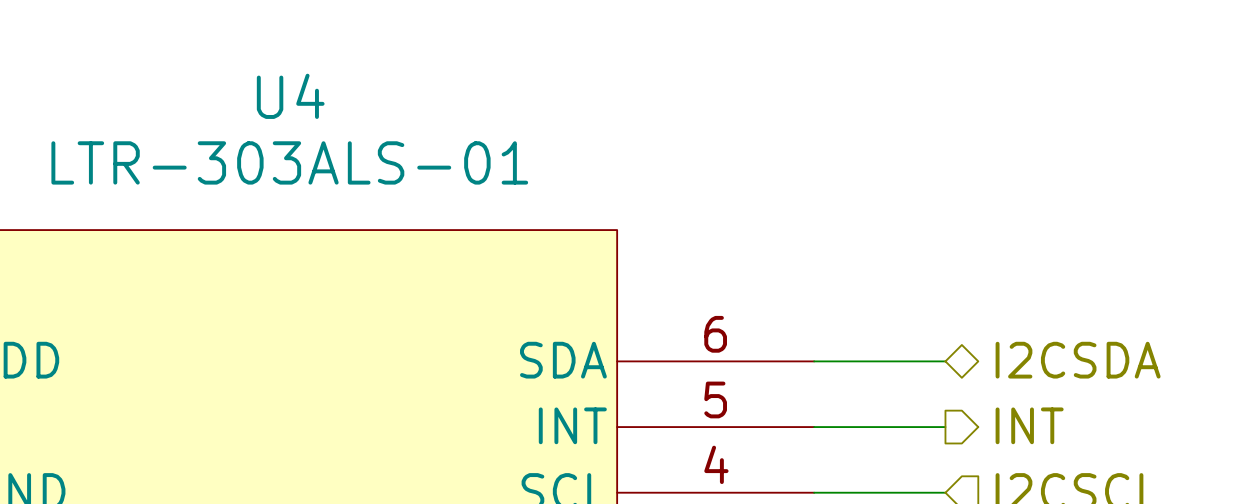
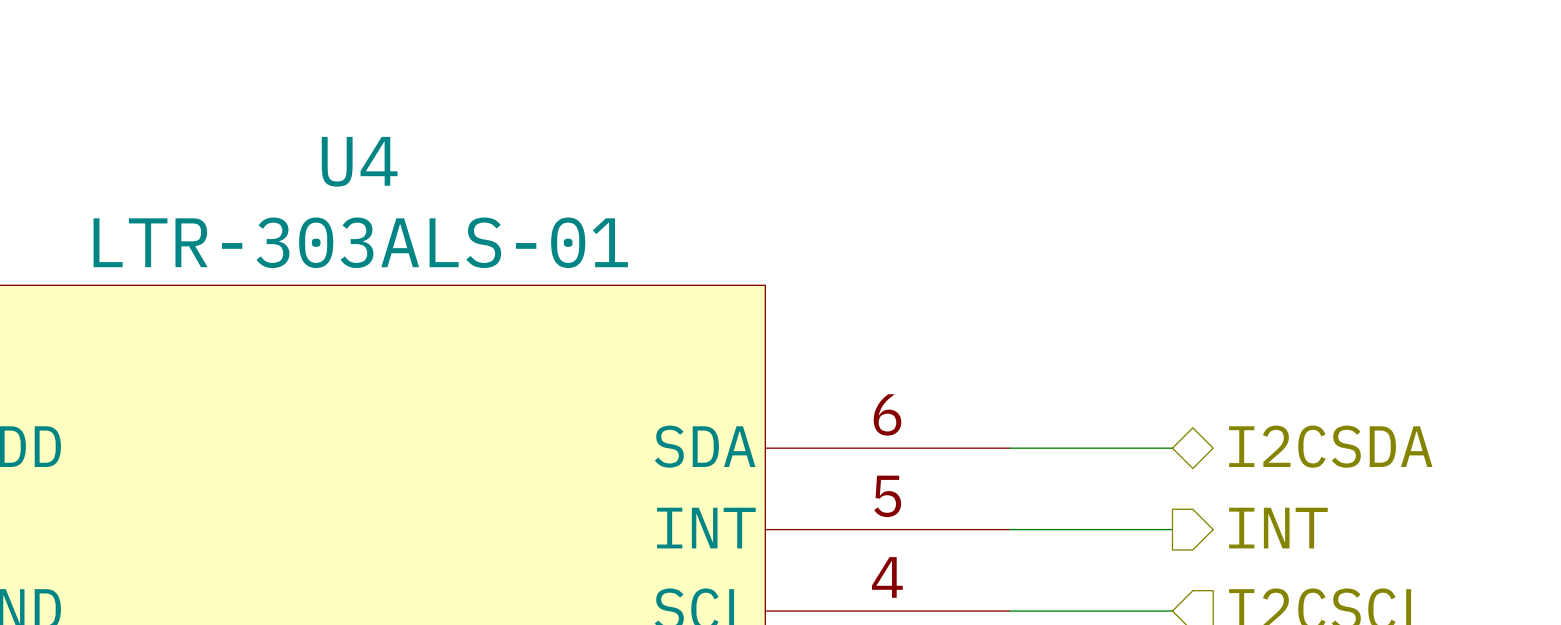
U4 name position: U4 (290, 96) -> U4 (359, 161)
U4 value position: LTR-303ALS-01 (289, 162) -> LTR-303ALS-01 (360, 242)

